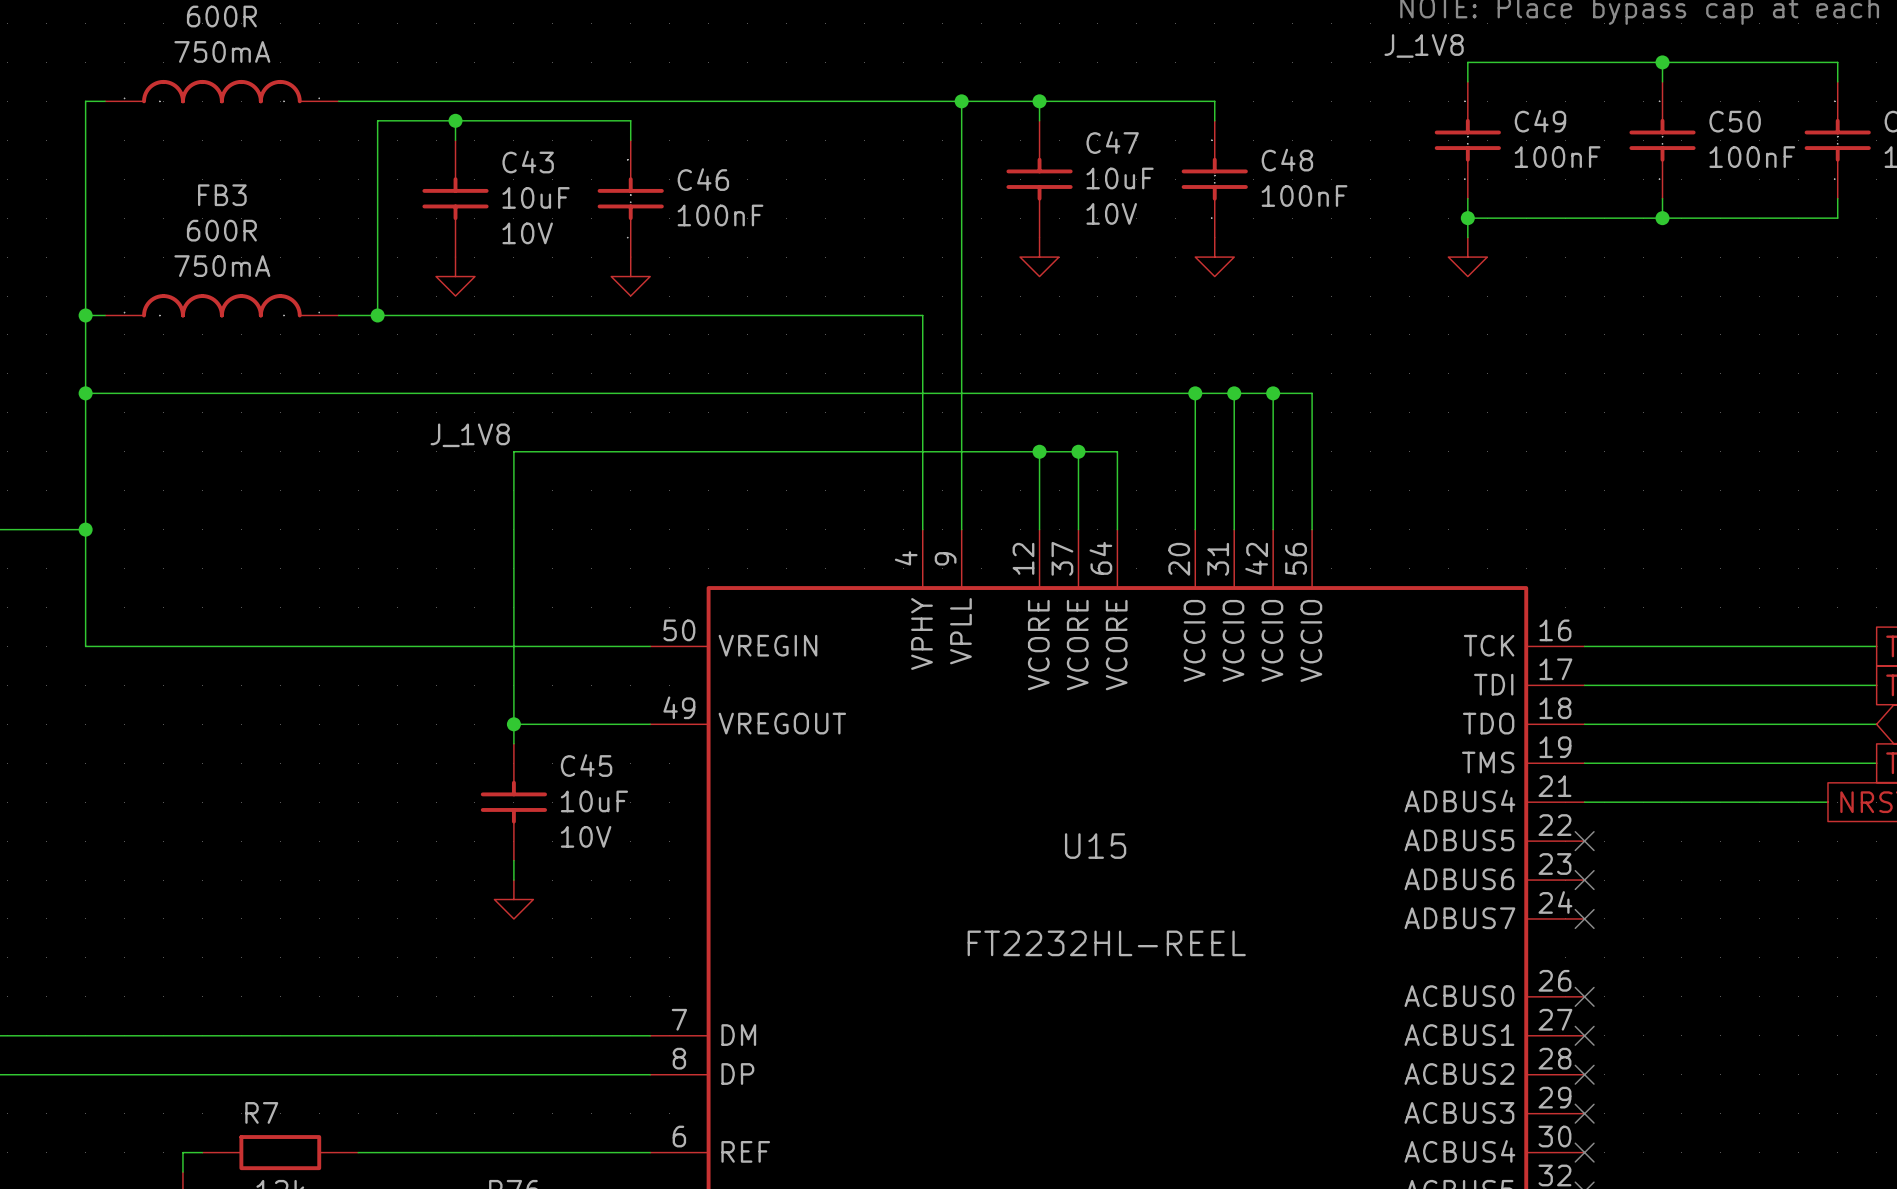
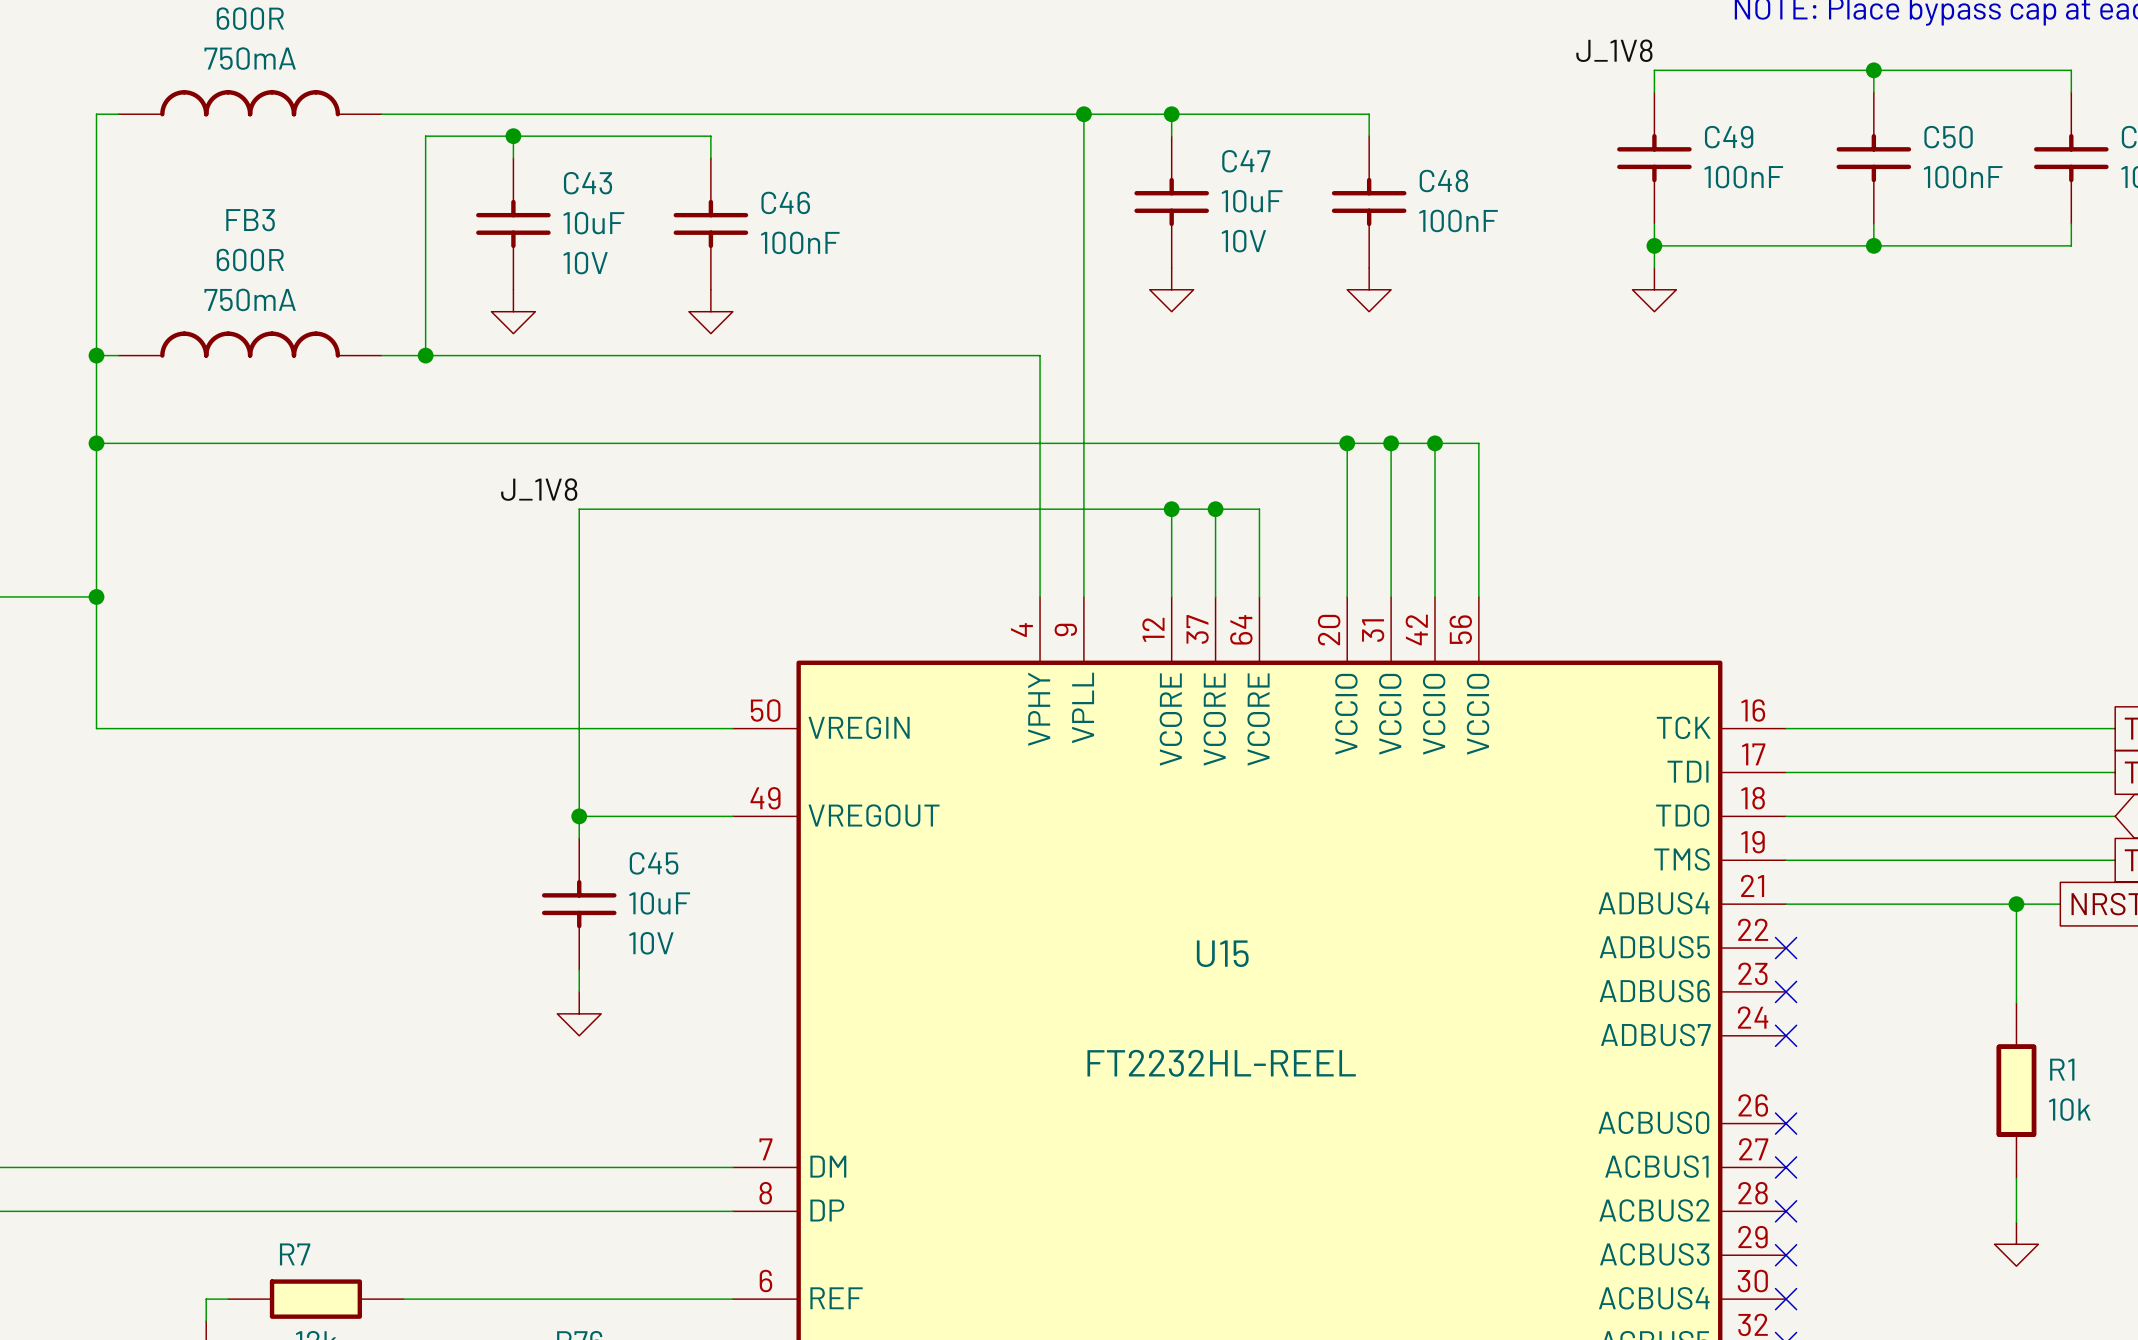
wire: none -> (2016, 904) (2016, 1002)
junction: none -> (2016, 904)
R1: none -> (2016, 1090)
wire: none -> (2016, 1178) (2016, 1222)
power symbol: none -> (2016, 1244)

